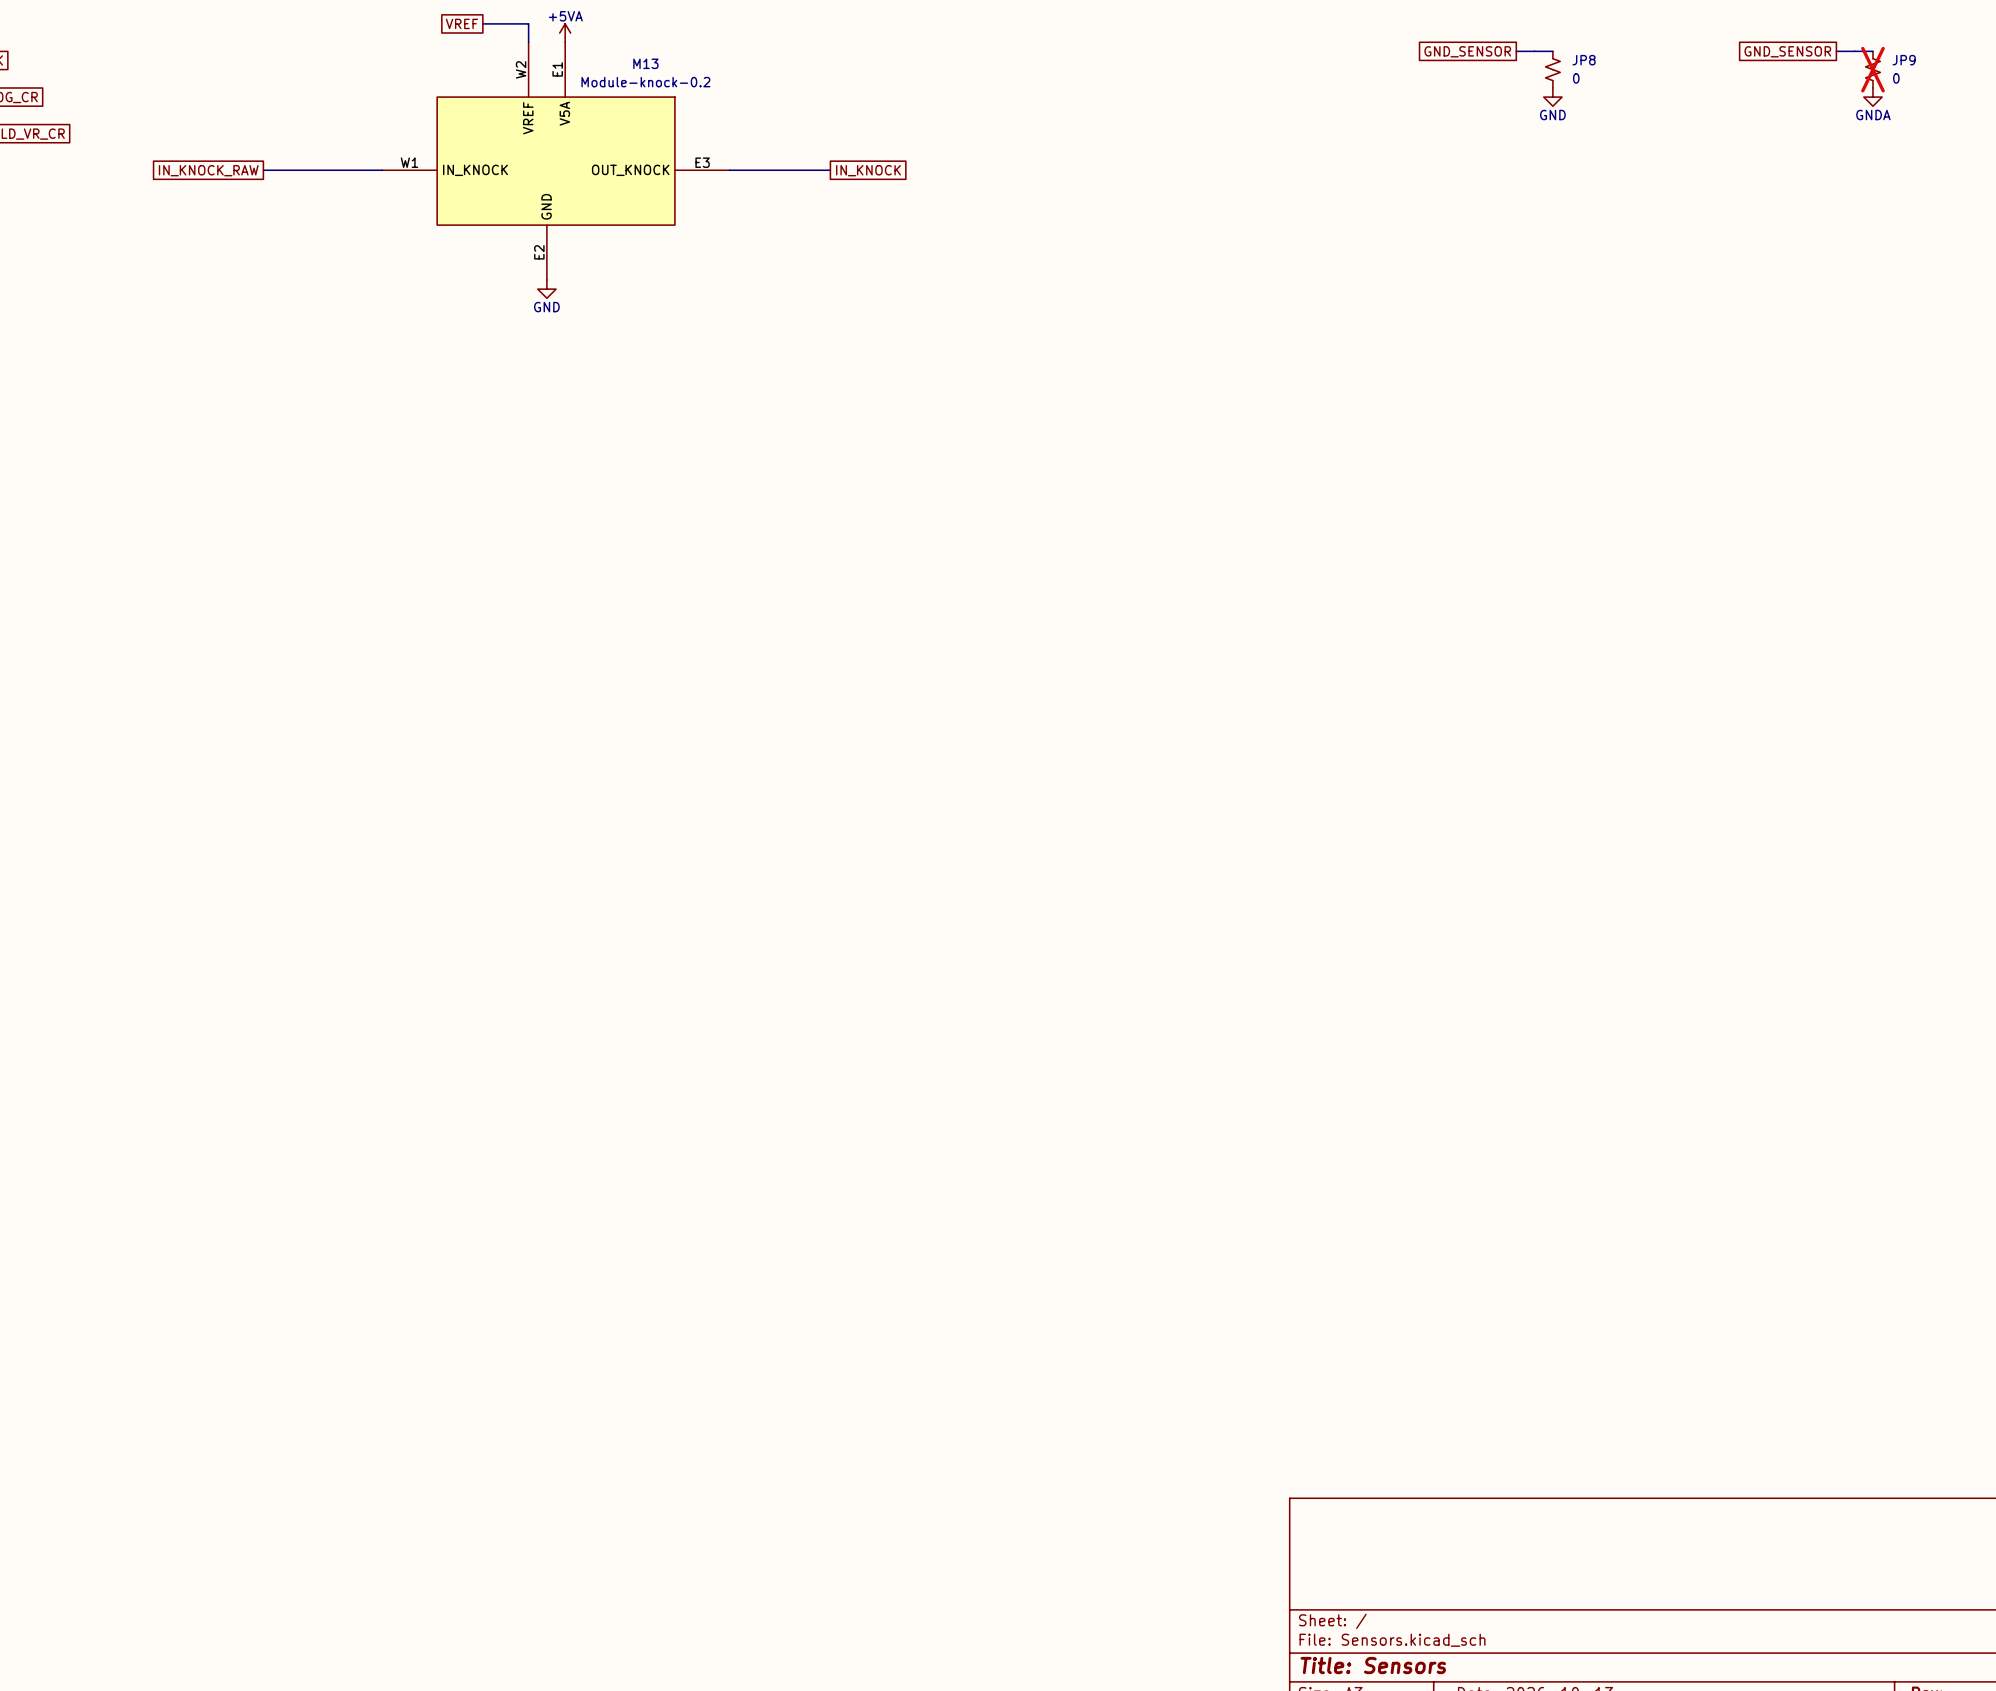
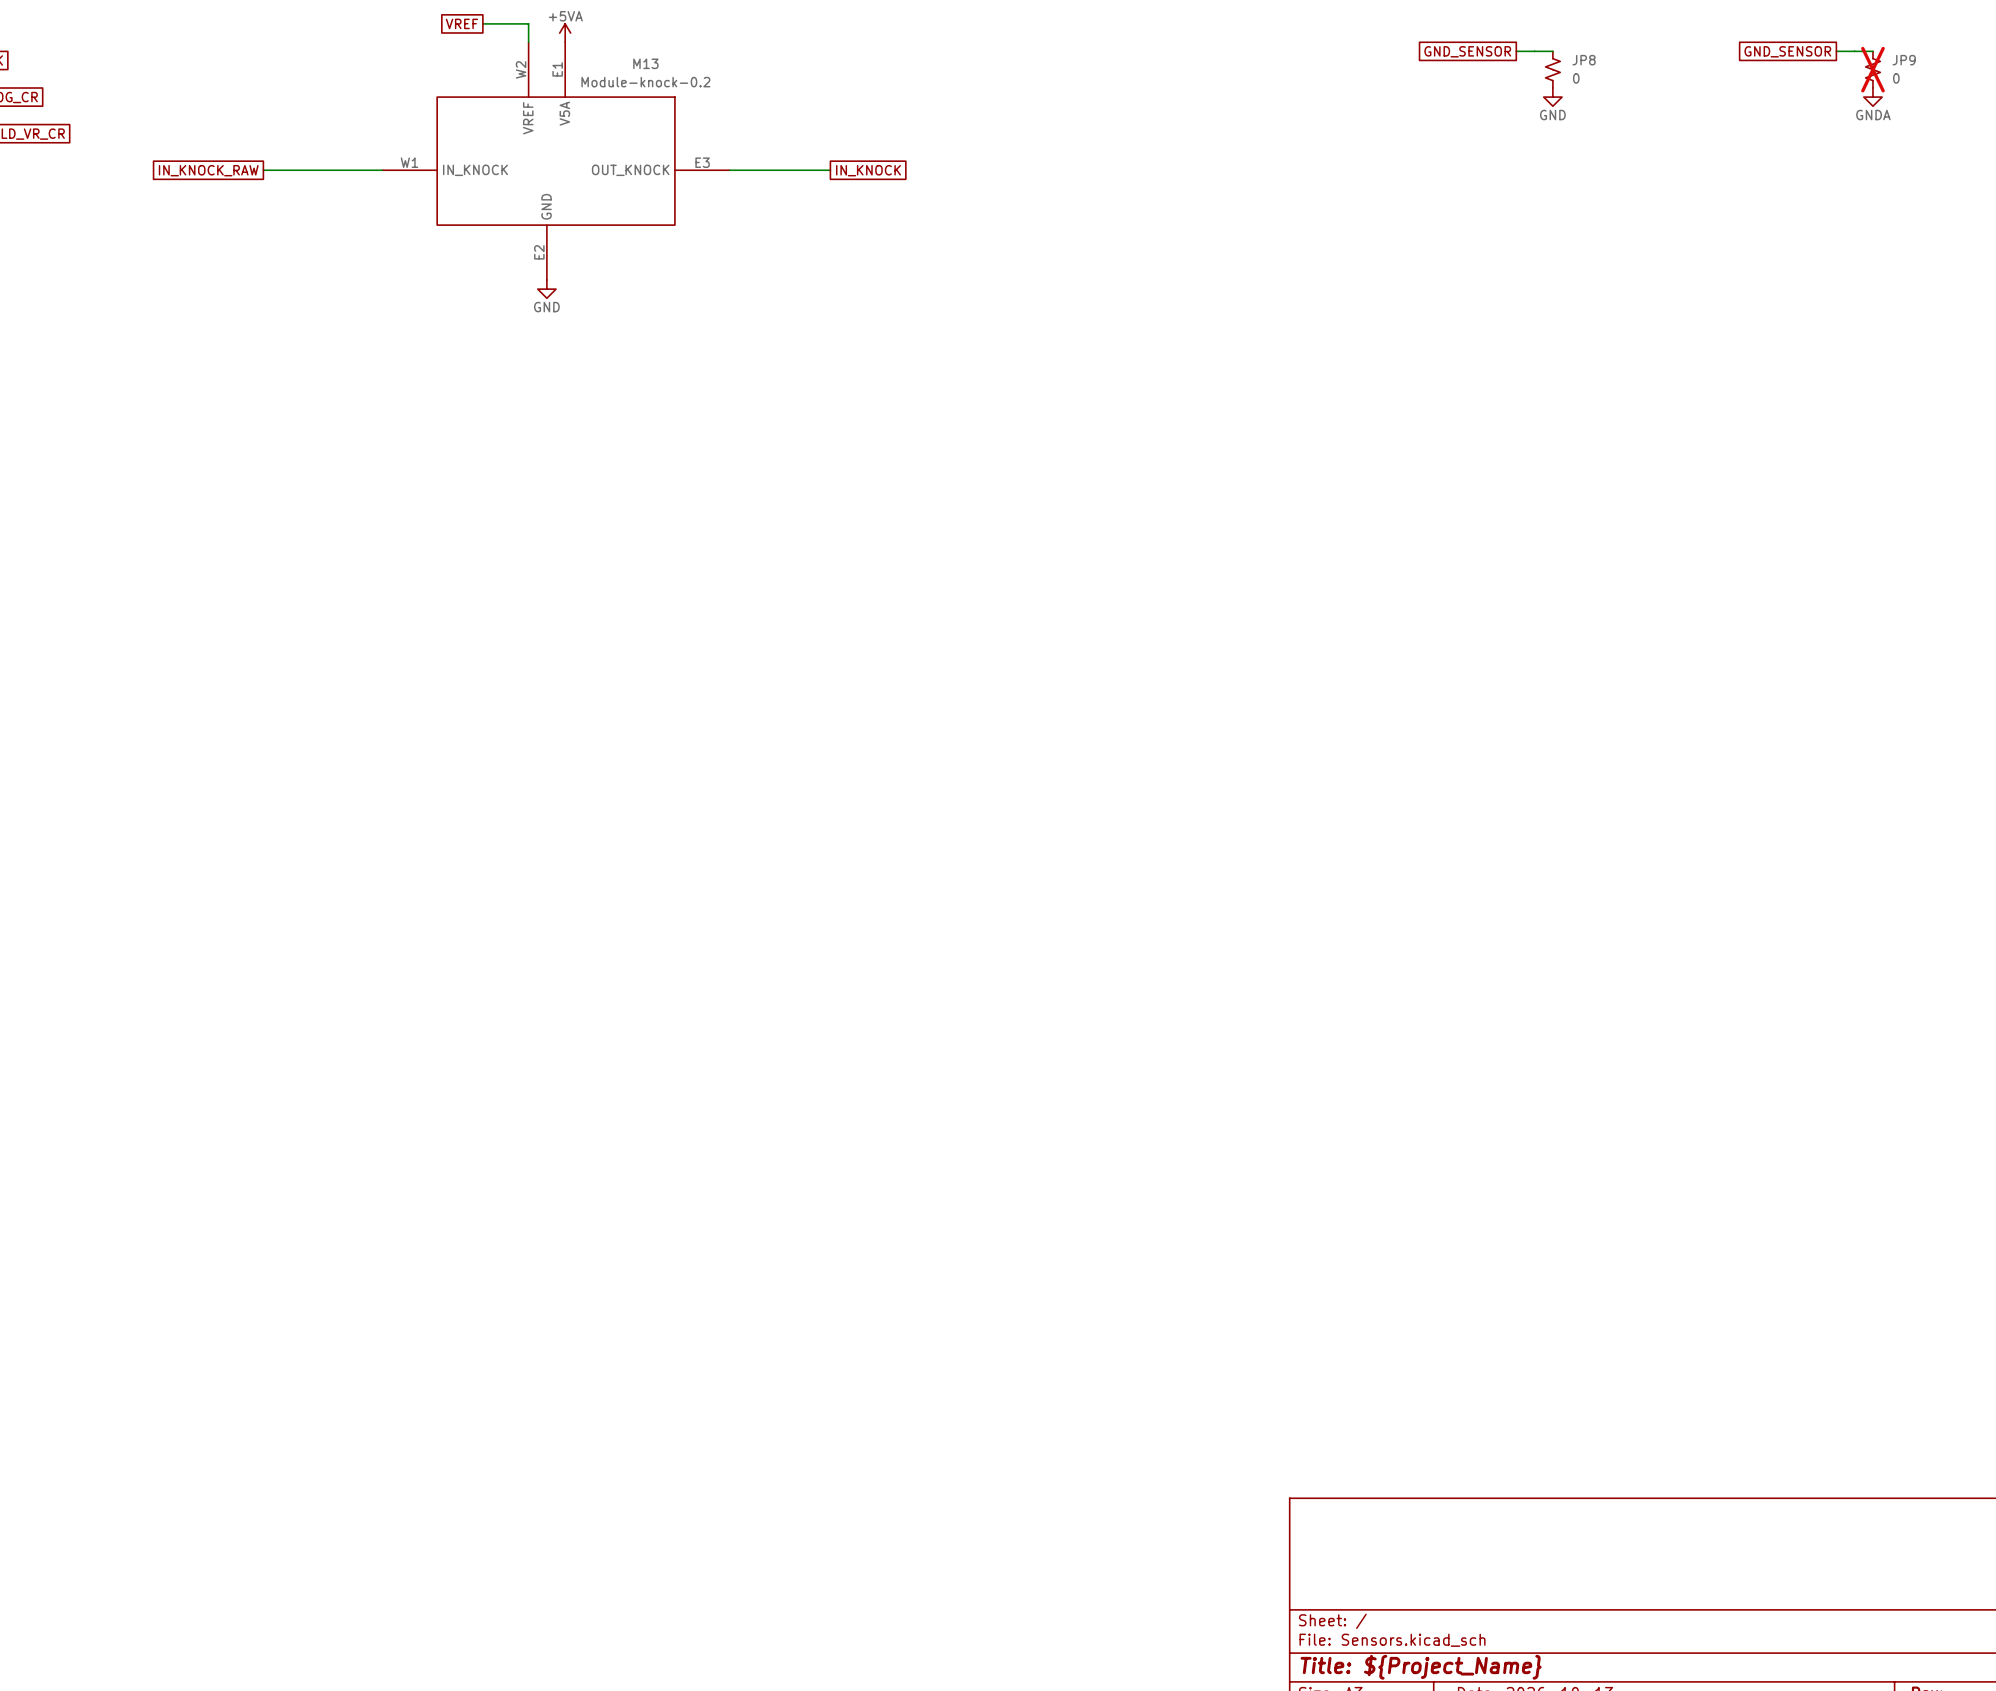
title block: Title: Sensors (1373, 1665) -> Title: ${Project_Name} (1421, 1667)

